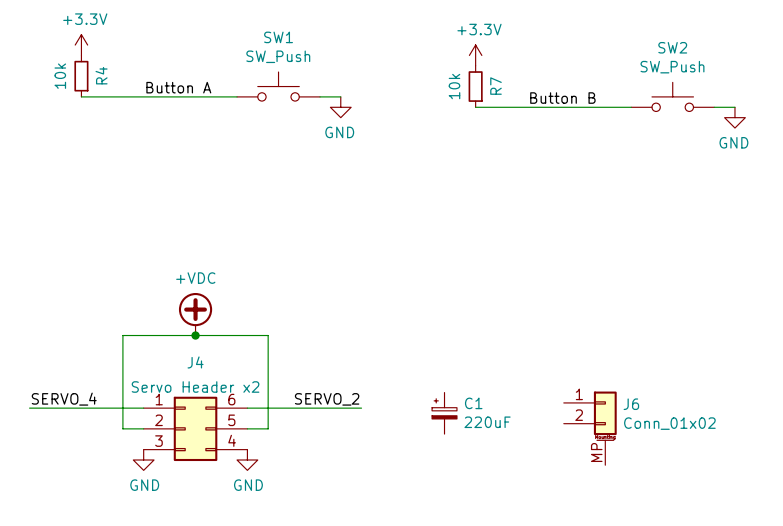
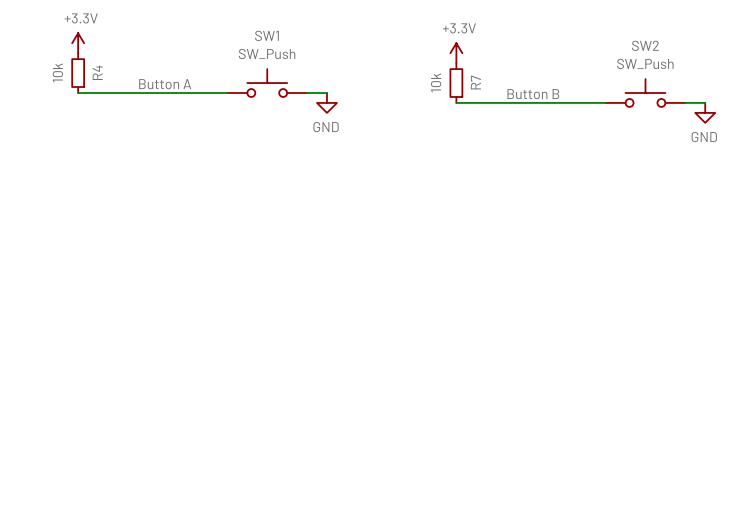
power symbol: +VDC (195, 314) -> none
junction: (195, 335) -> none
label: SERVO_4 (64, 399) -> none
label: SERVO_2 (327, 399) -> none
wire: (29, 408) (143, 408) -> none
wire: (247, 408) (361, 408) -> none
C1: 220uF (444, 413) -> none
wire: (143, 428) (122, 428) (122, 335) (268, 335) (268, 428) (247, 428) -> none
J4: Servo Header x2 (195, 428) -> none
J6: Conn_01x02 (590, 428) -> none
power symbol: GND (143, 460) -> none
power symbol: GND (247, 460) -> none

